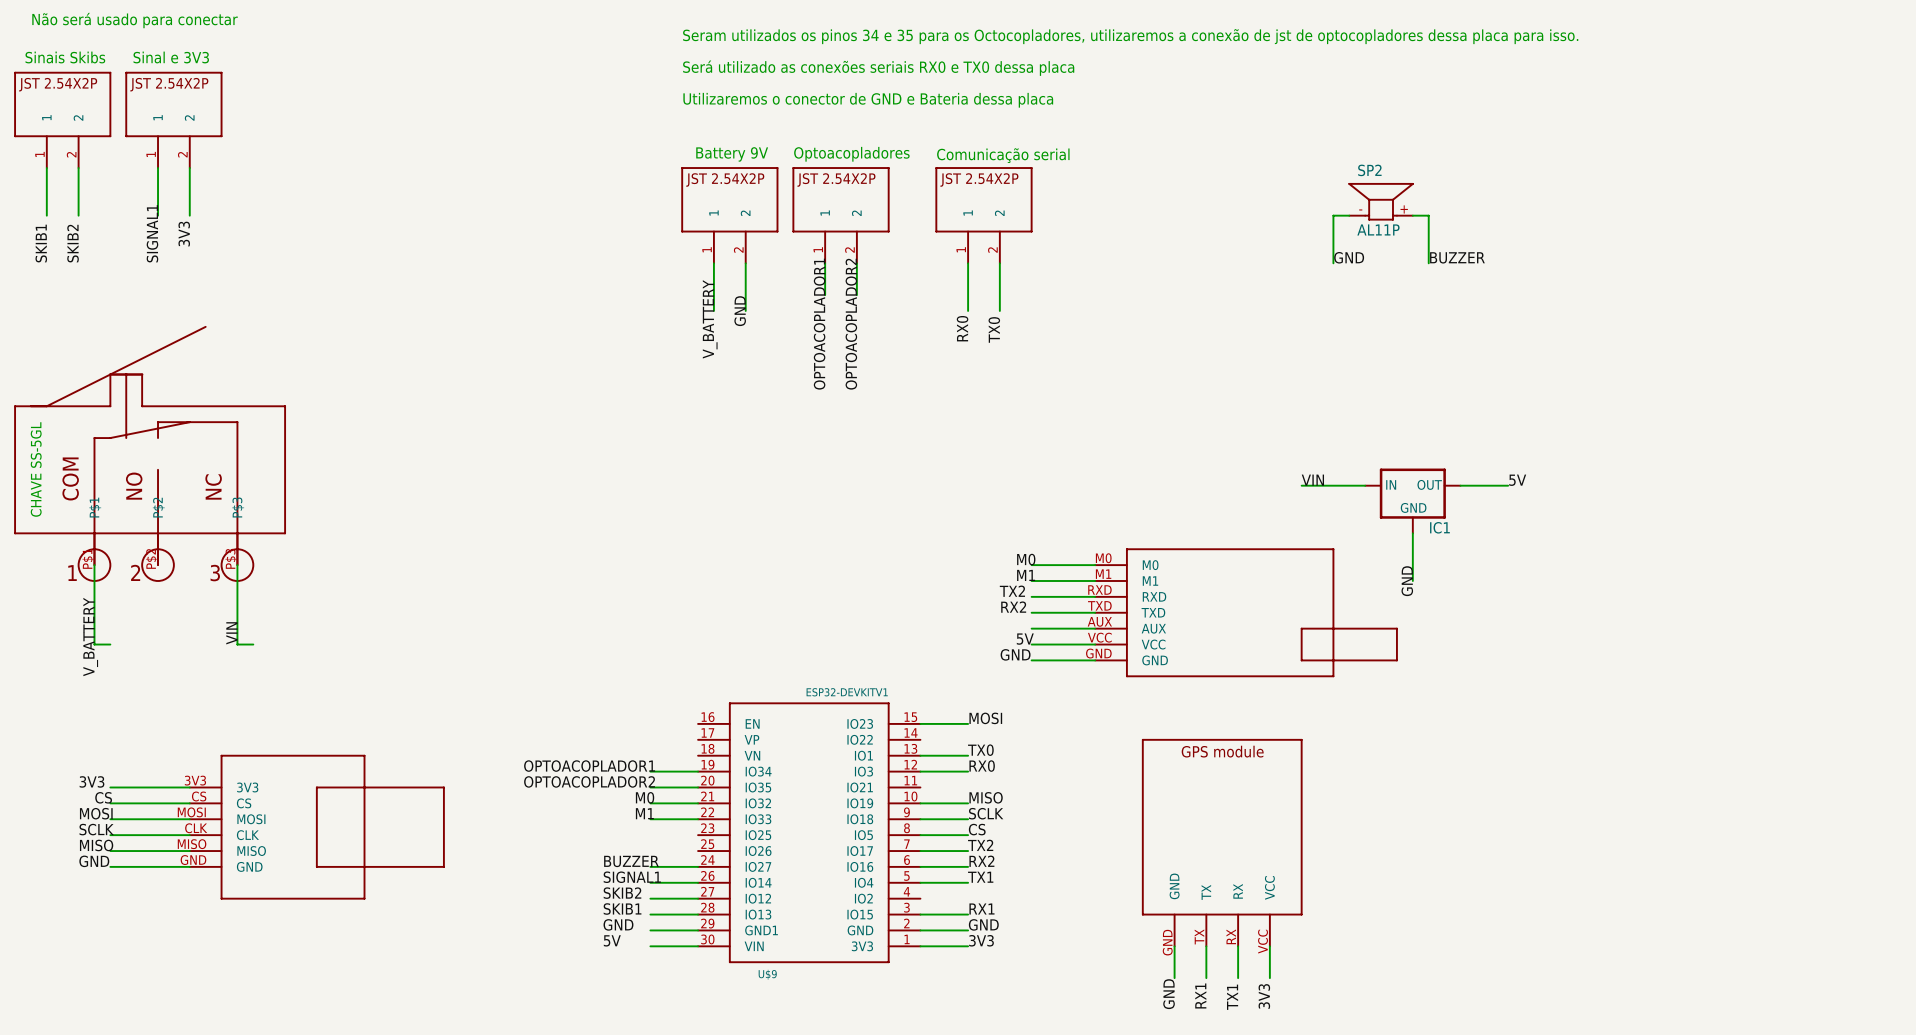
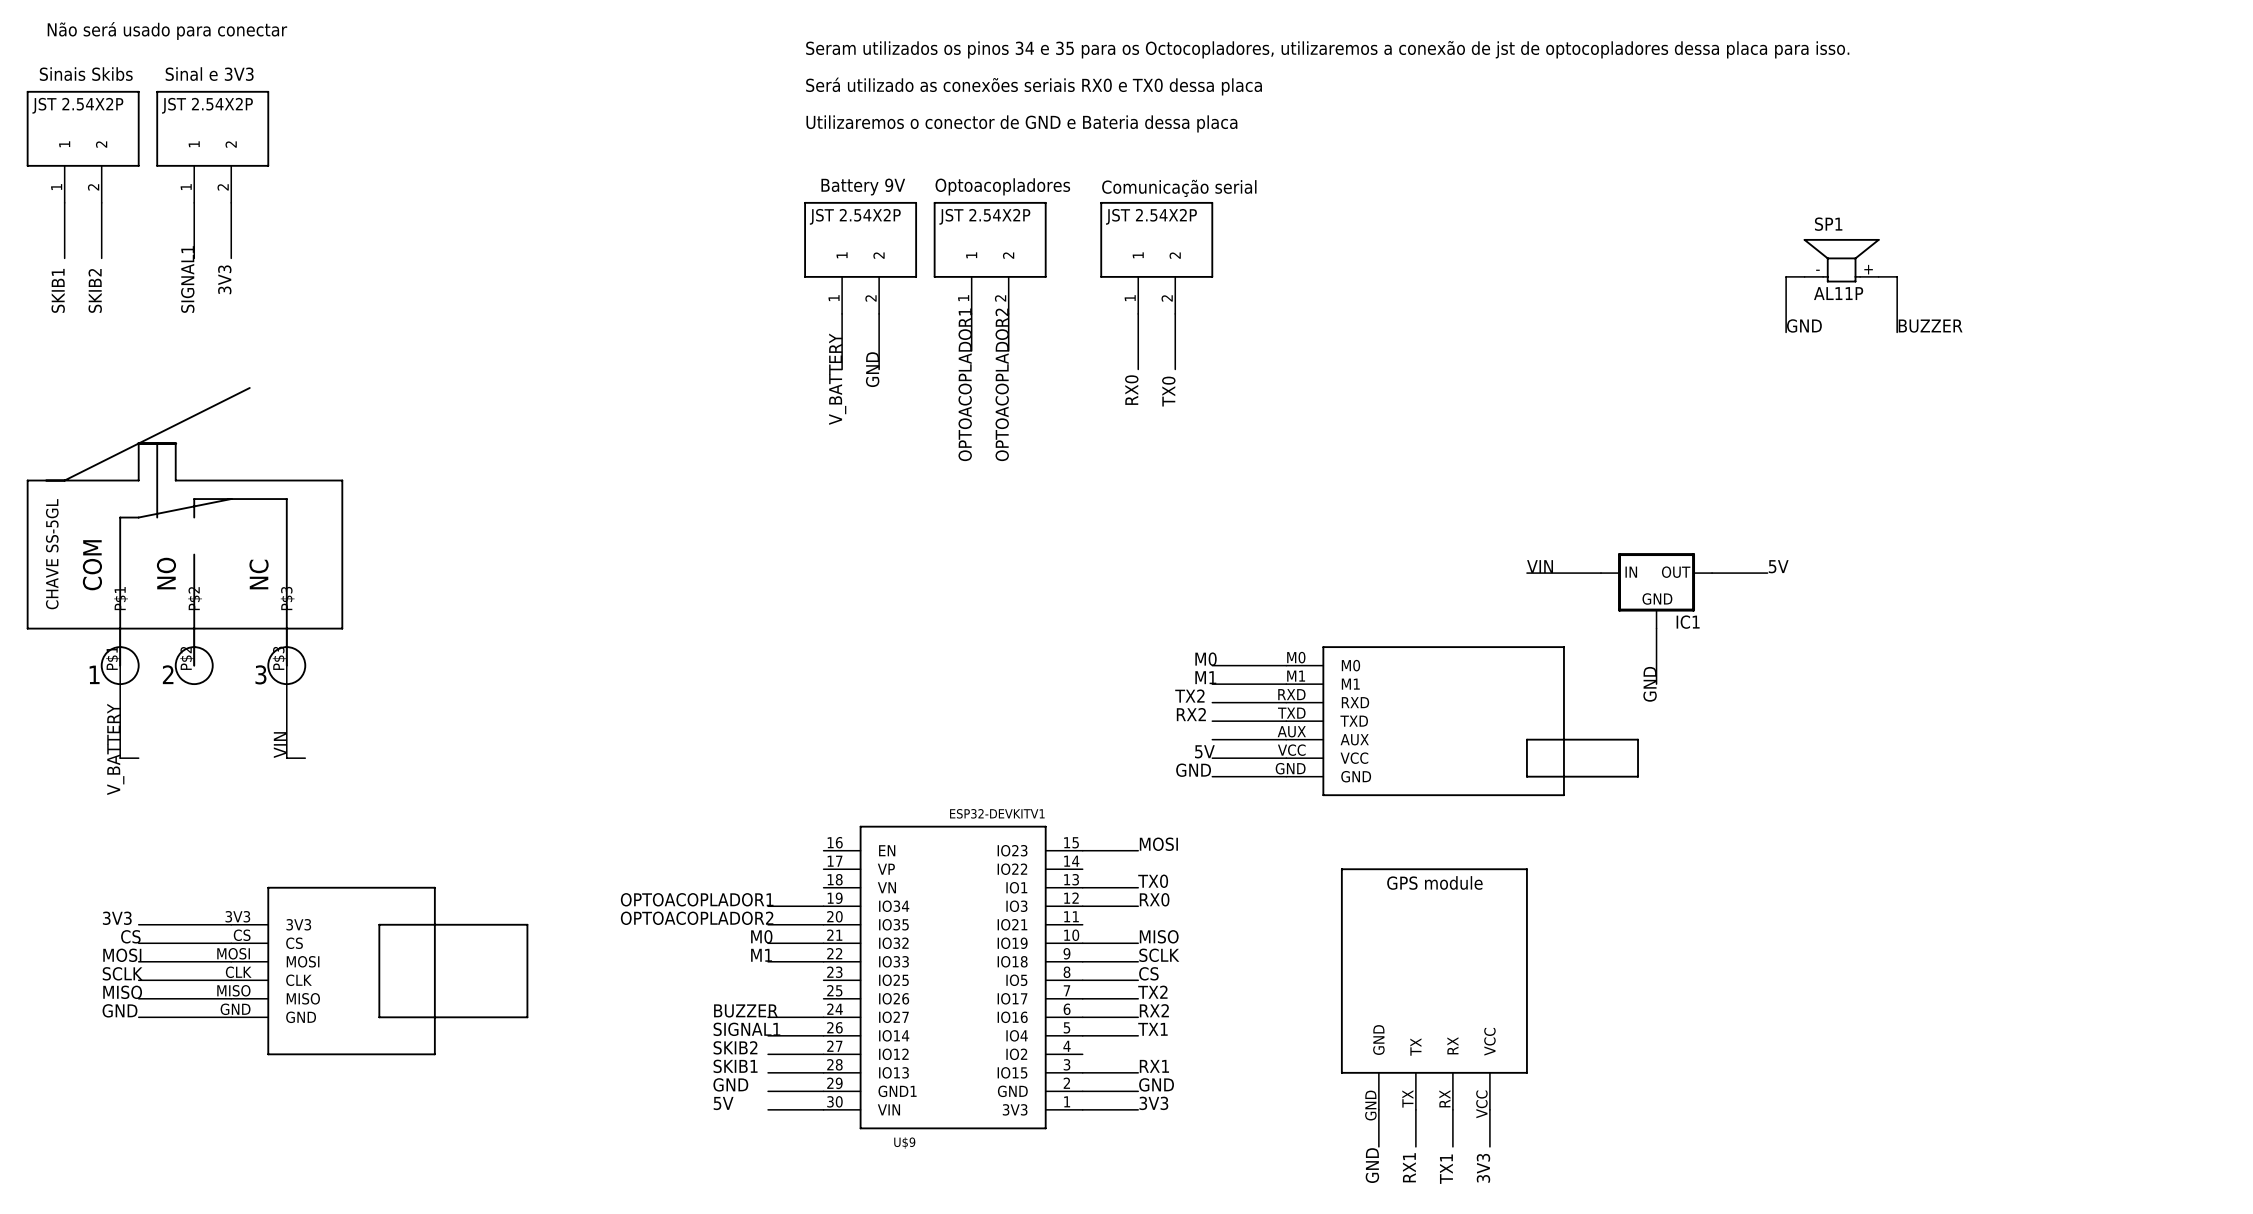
SP2: AL11P (1381, 201) -> none
wire: (1349, 215) (1333, 215) (1333, 263) -> none
wire: (1412, 215) (1428, 215) (1428, 263) -> none
SP1: none -> AL11P (1841, 260)
wire: none -> (1804, 276) (1786, 276) (1786, 332)
wire: none -> (1878, 276) (1897, 276) (1897, 332)
label: GND (1349, 257) -> none
label: BUZZER (1457, 257) -> none
label: none -> GND (1804, 325)
label: none -> BUZZER (1930, 326)

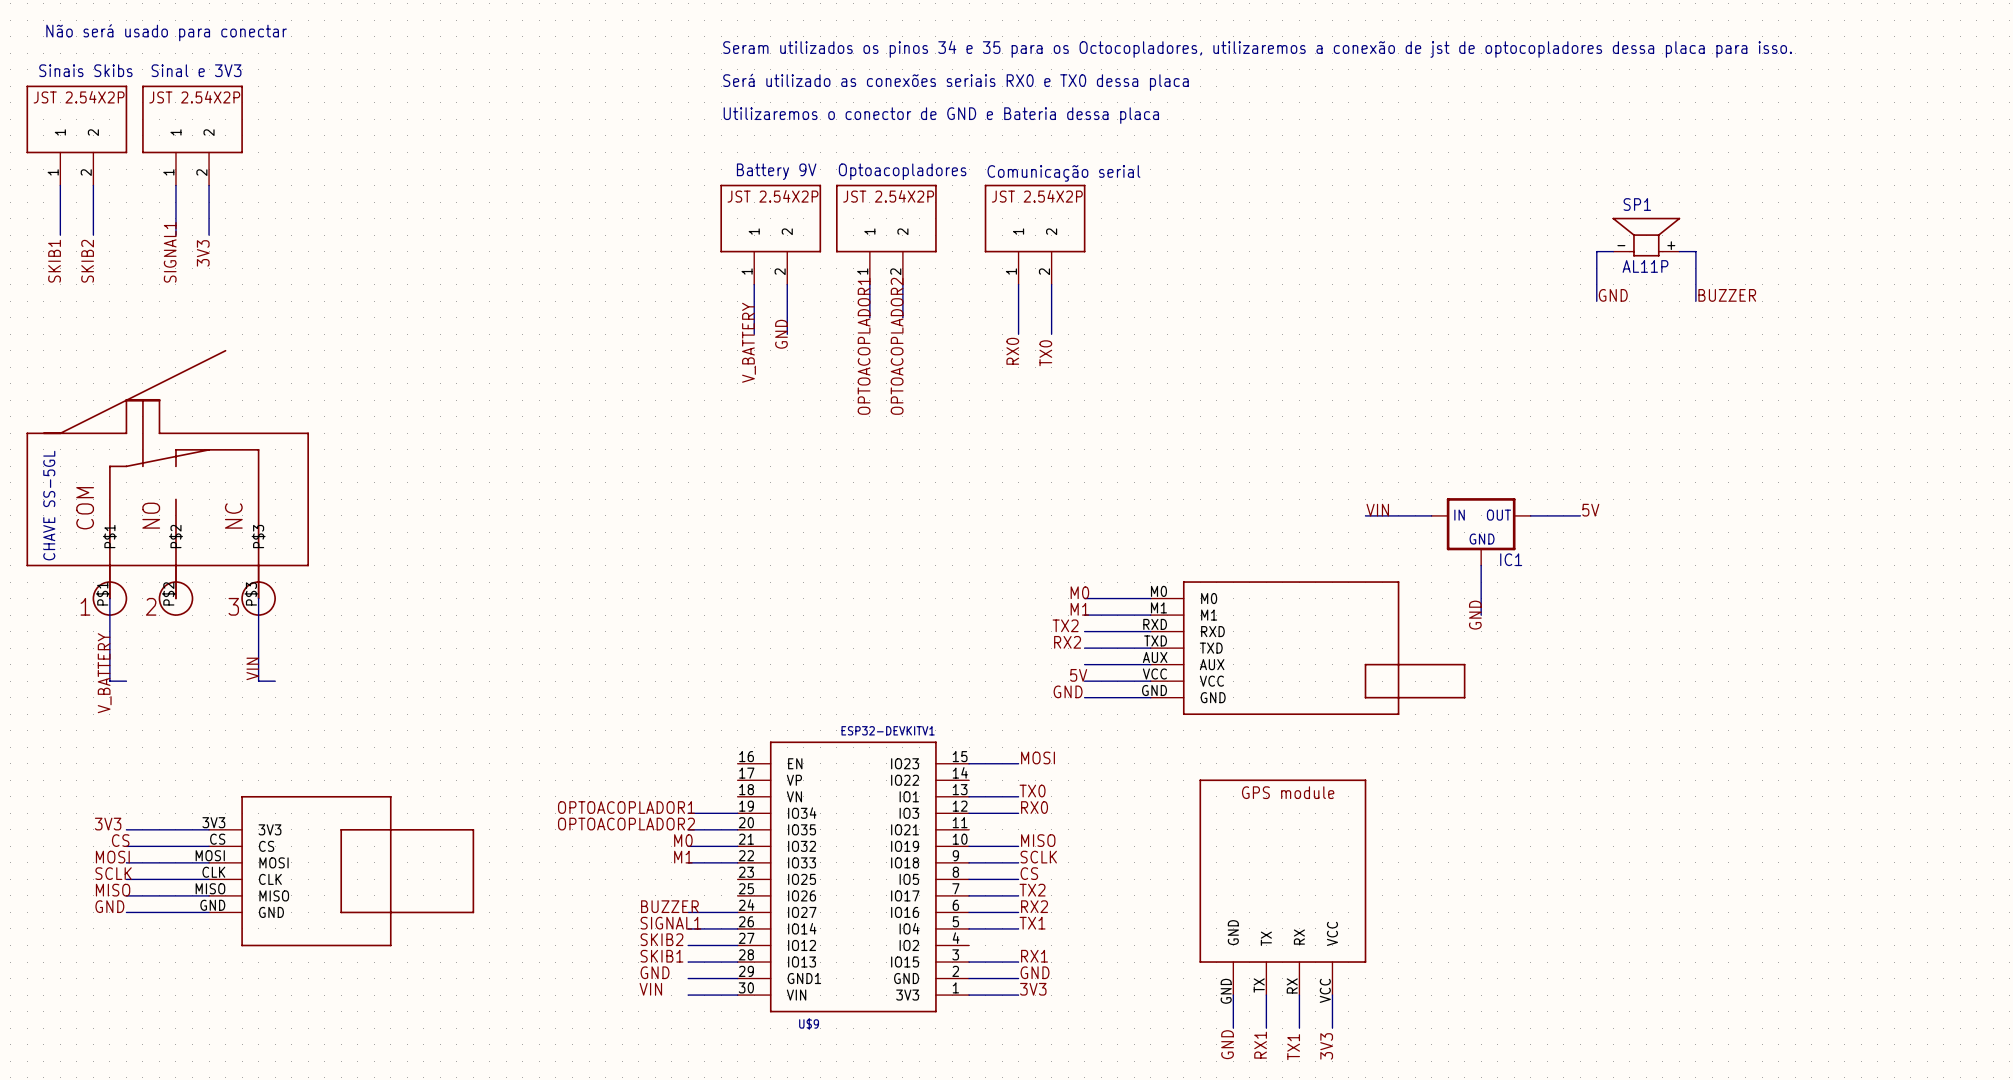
label: 5V (723, 1103) -> VIN (650, 989)

